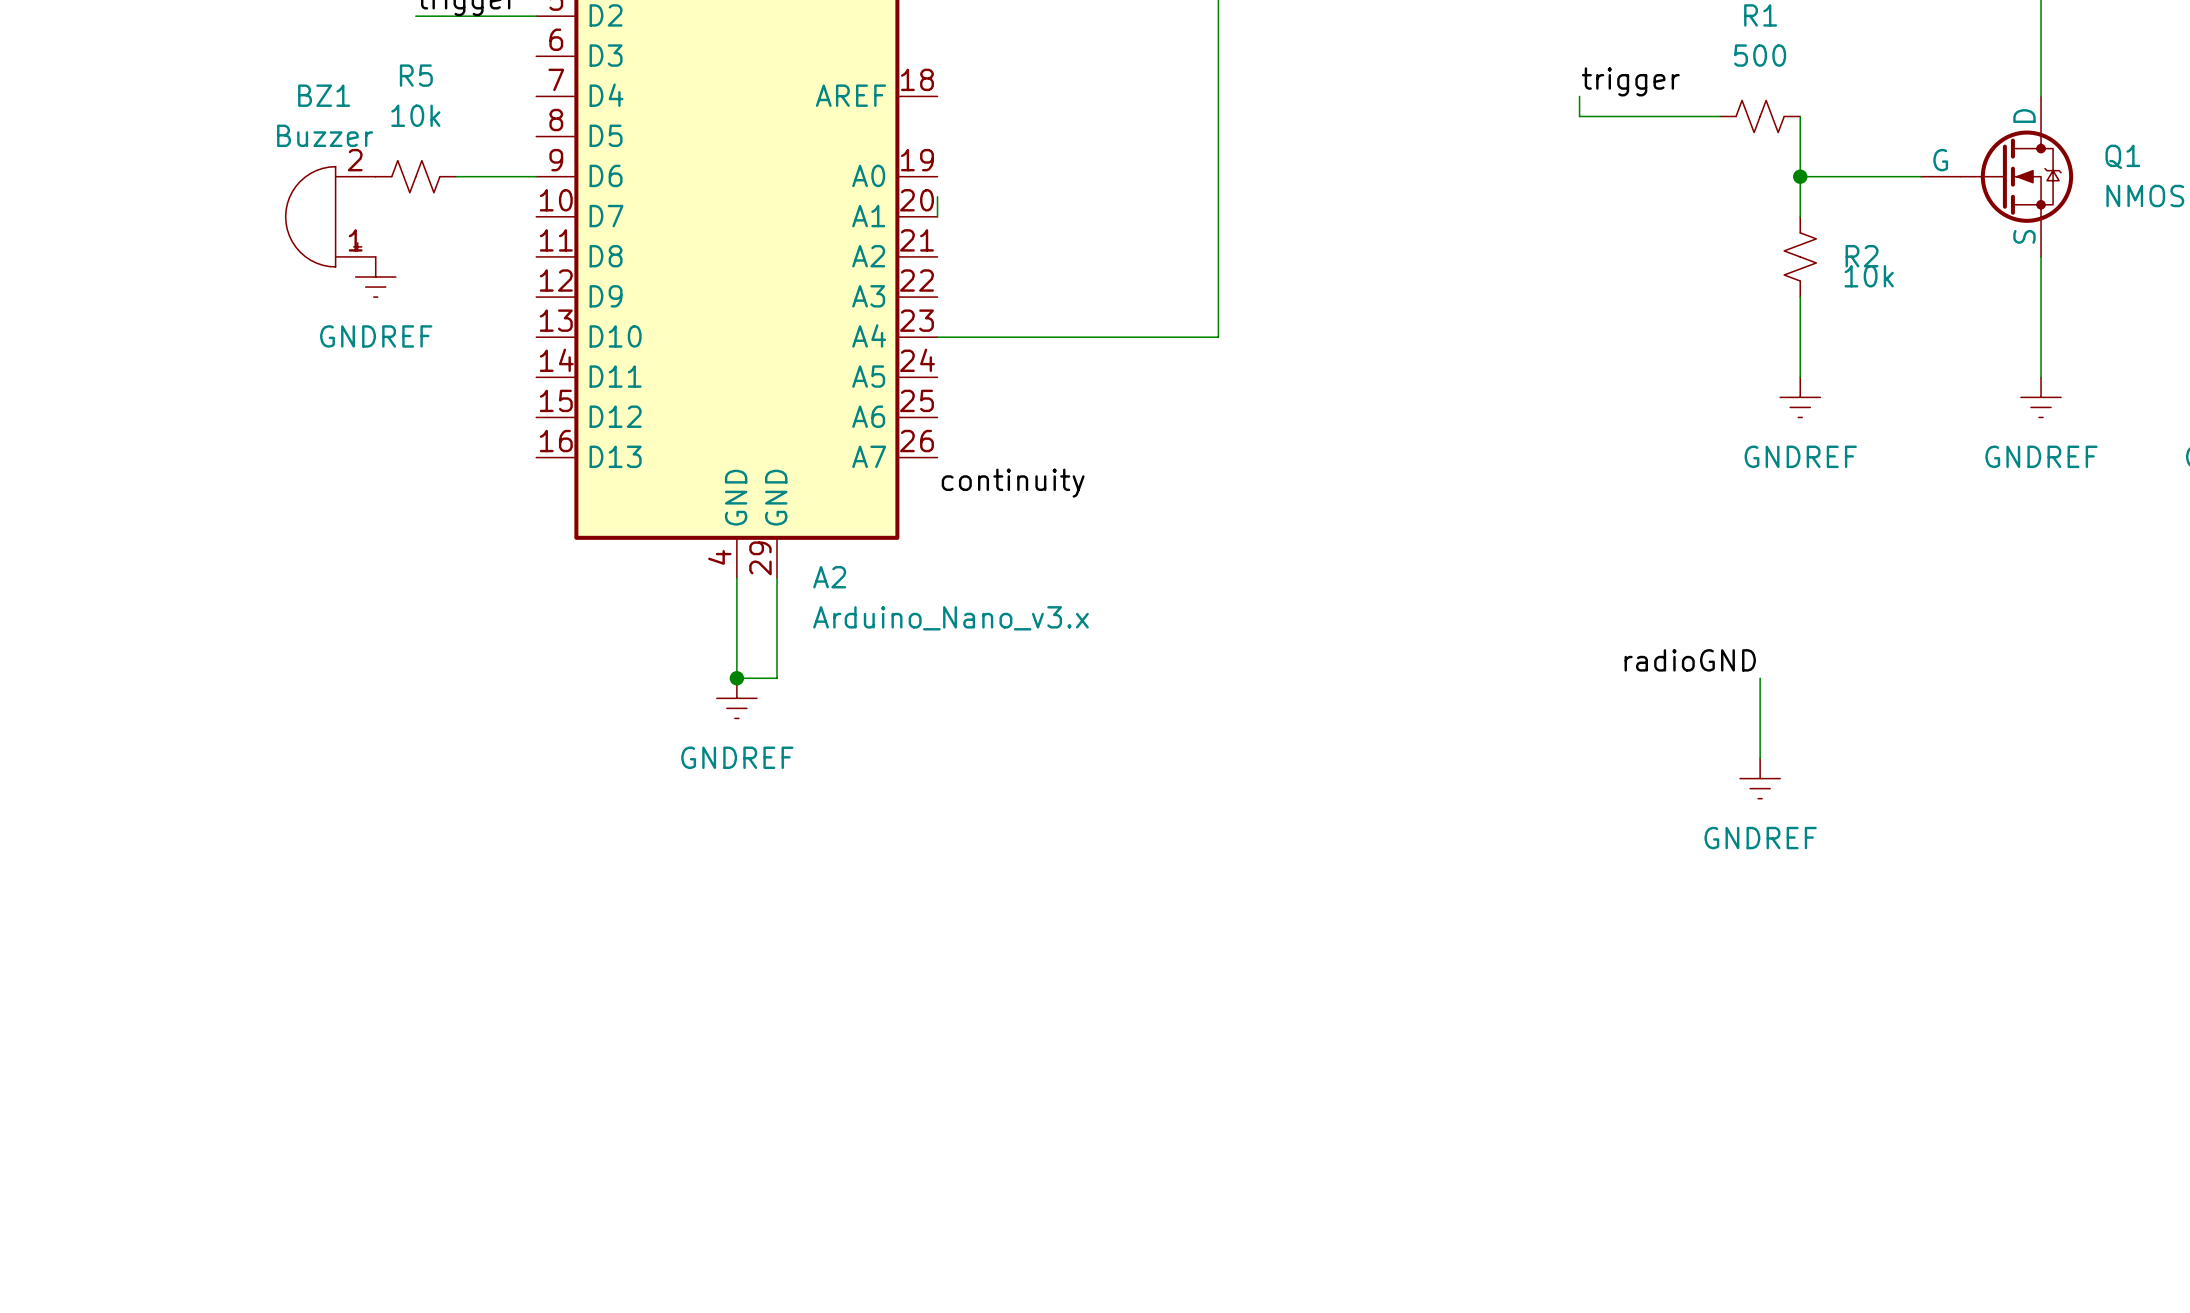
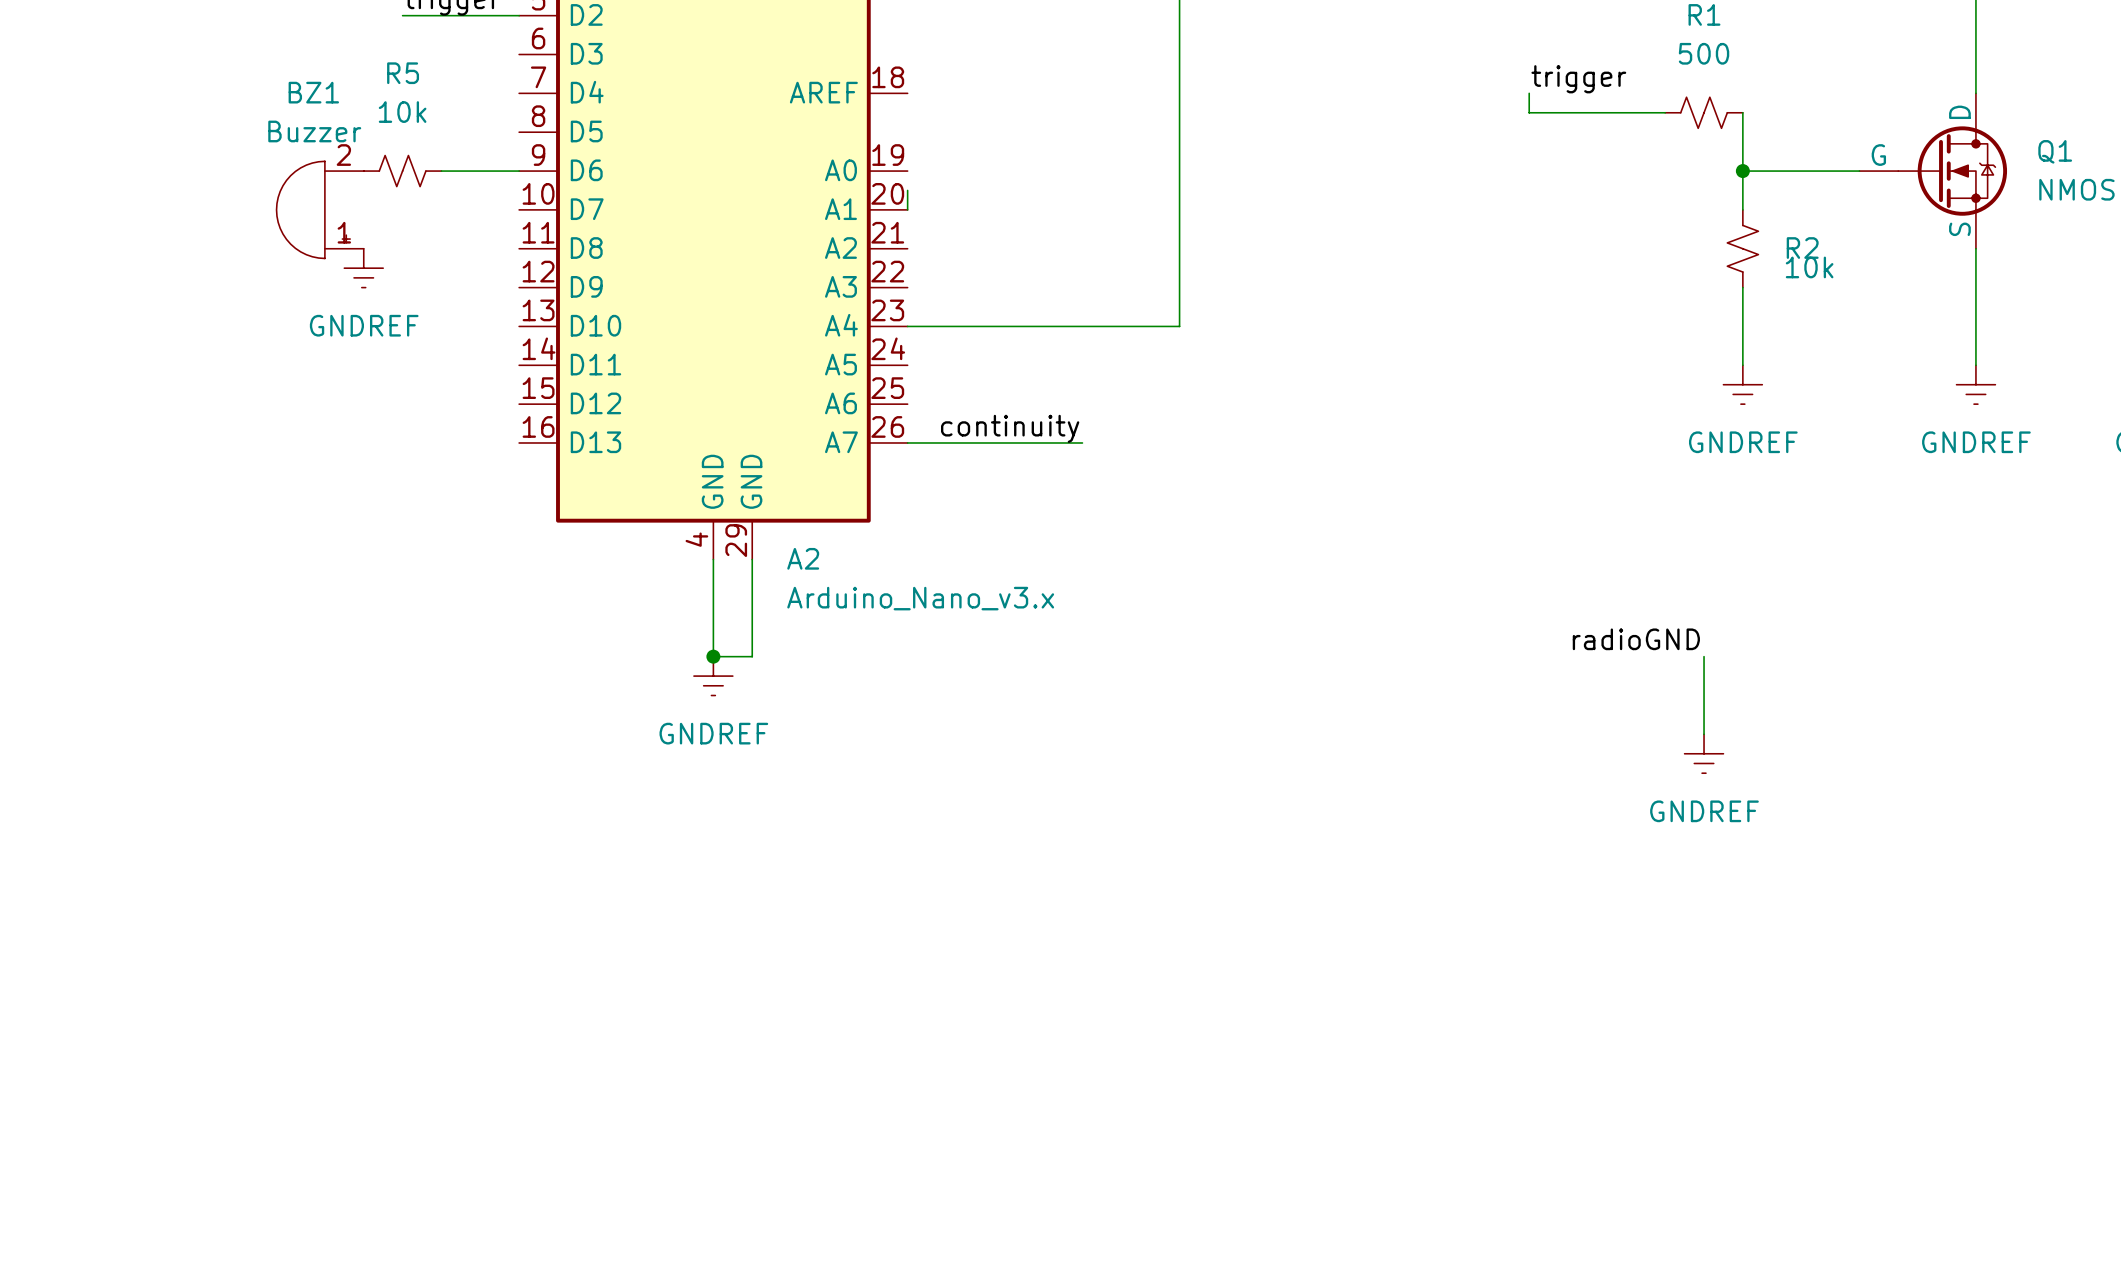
wire: none -> (907, 442) (1082, 442)
label position: continuity (1013, 483) -> continuity (1010, 428)

